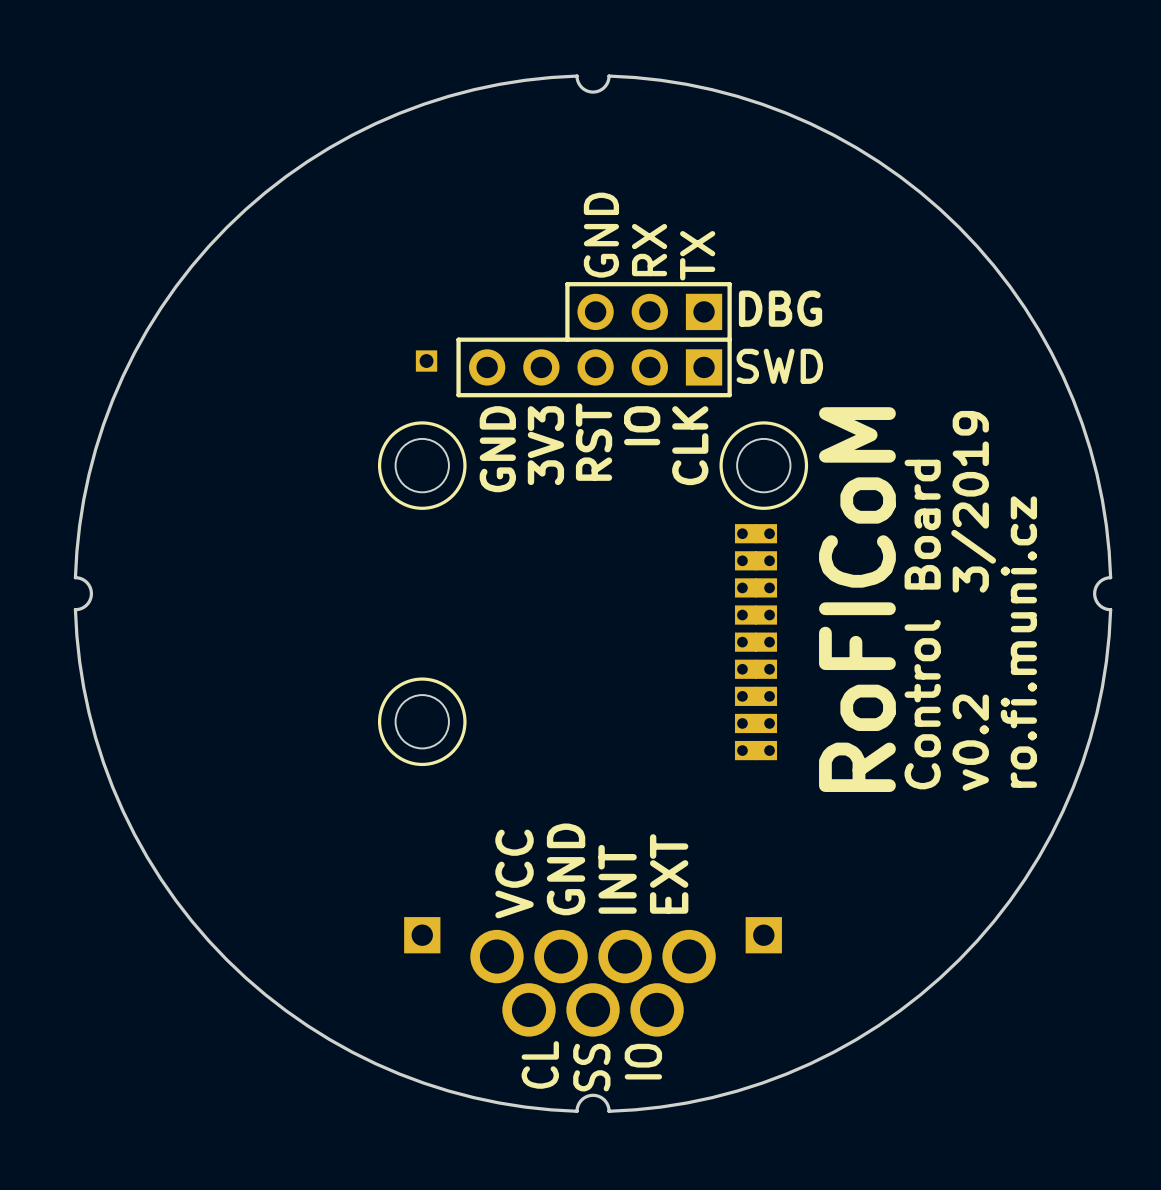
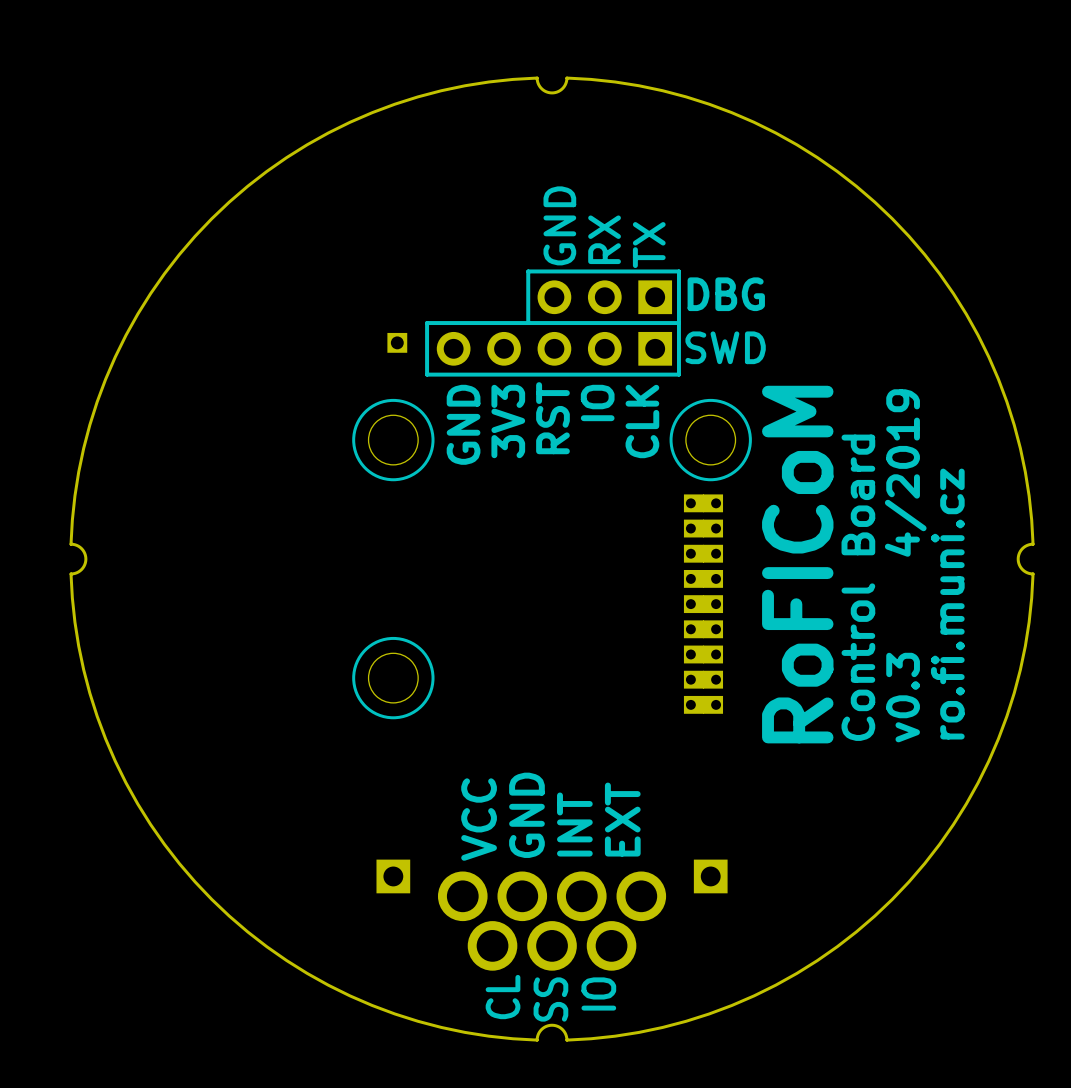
text: v0.2 3/2019 (973, 600) -> v0.3 4/2019 (905, 565)

